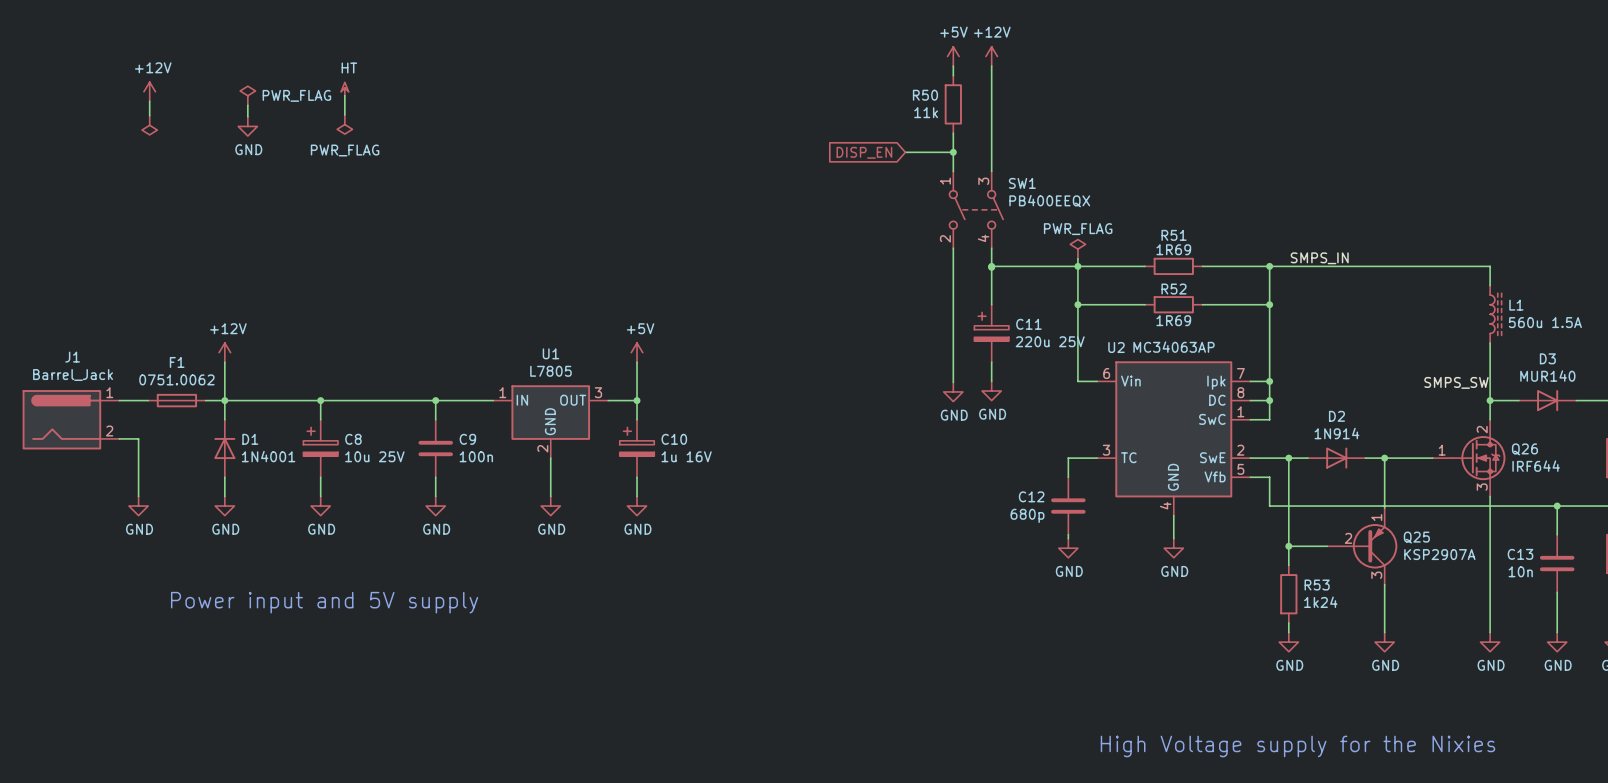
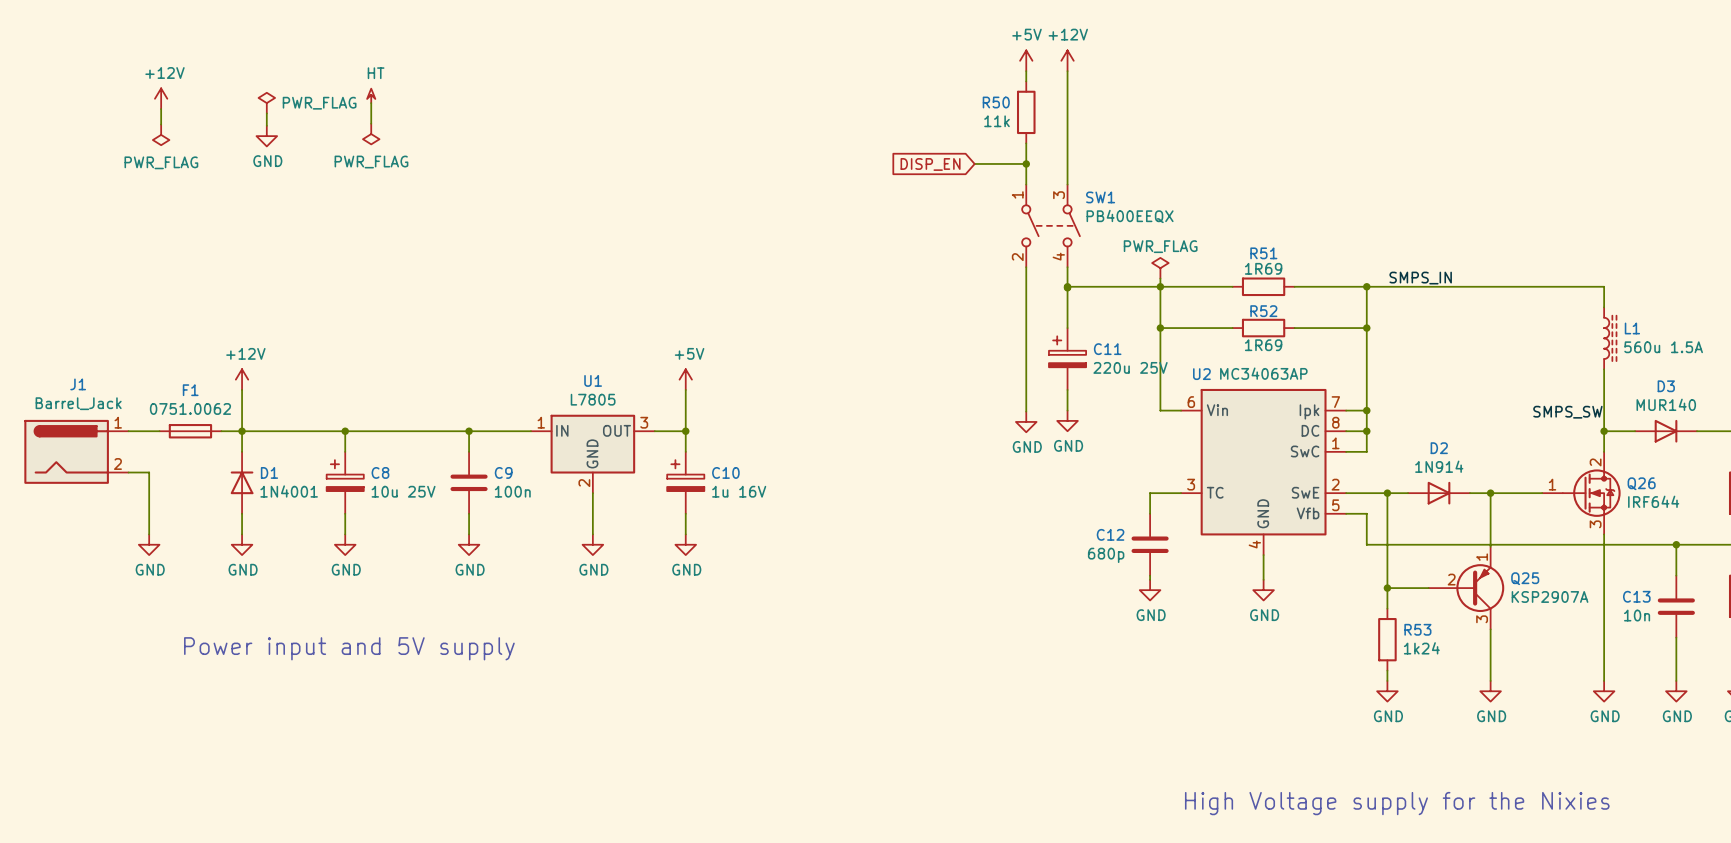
power symbol text: none -> PWR_FLAG (161, 162)

